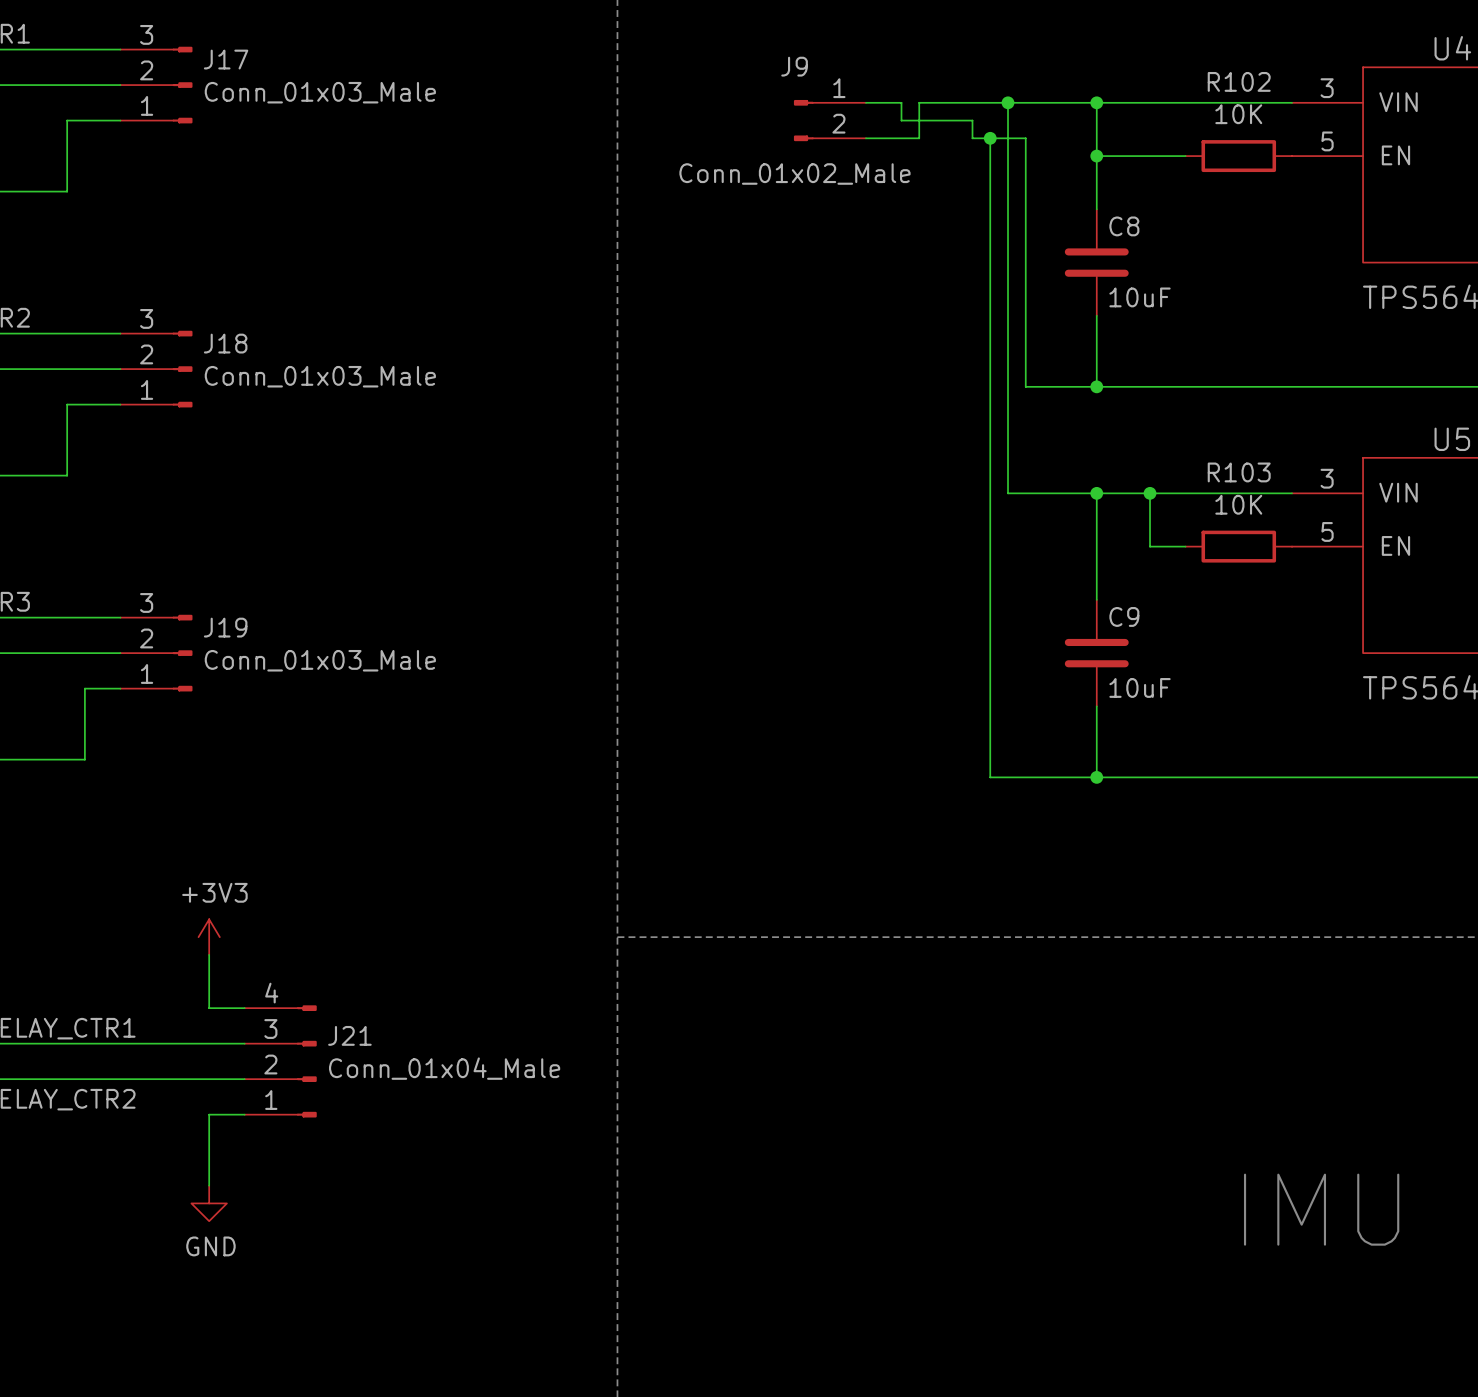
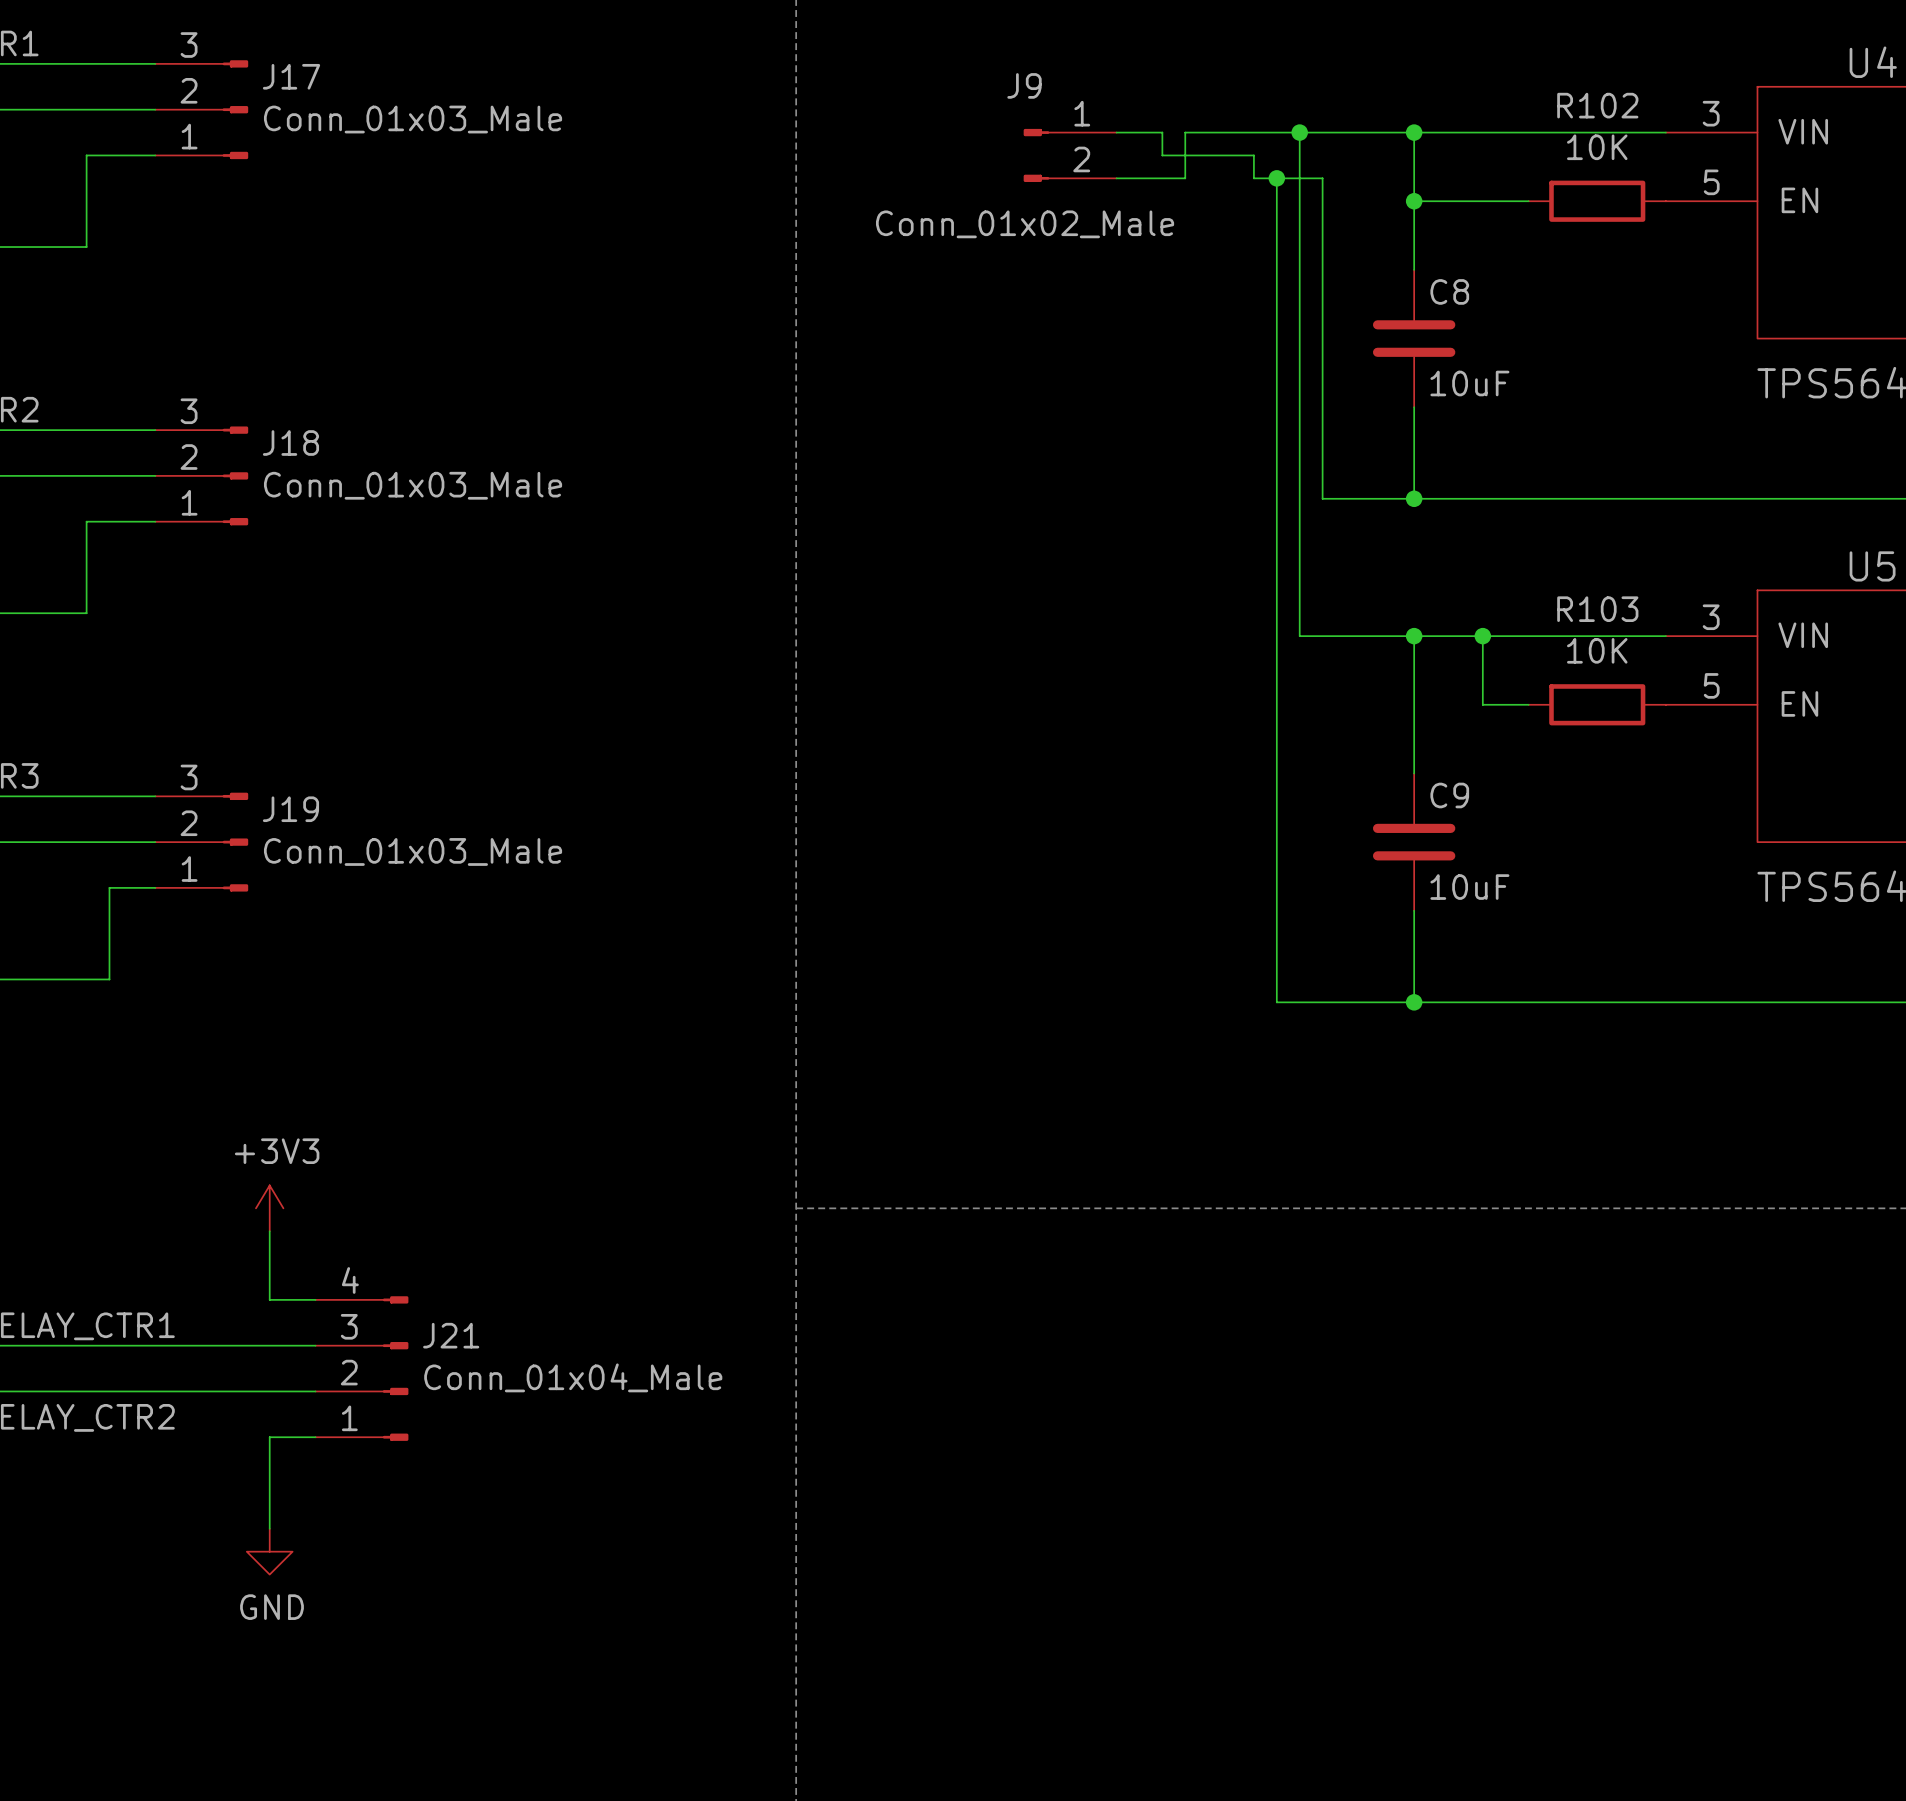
text: IMU (1321, 1209) -> none

